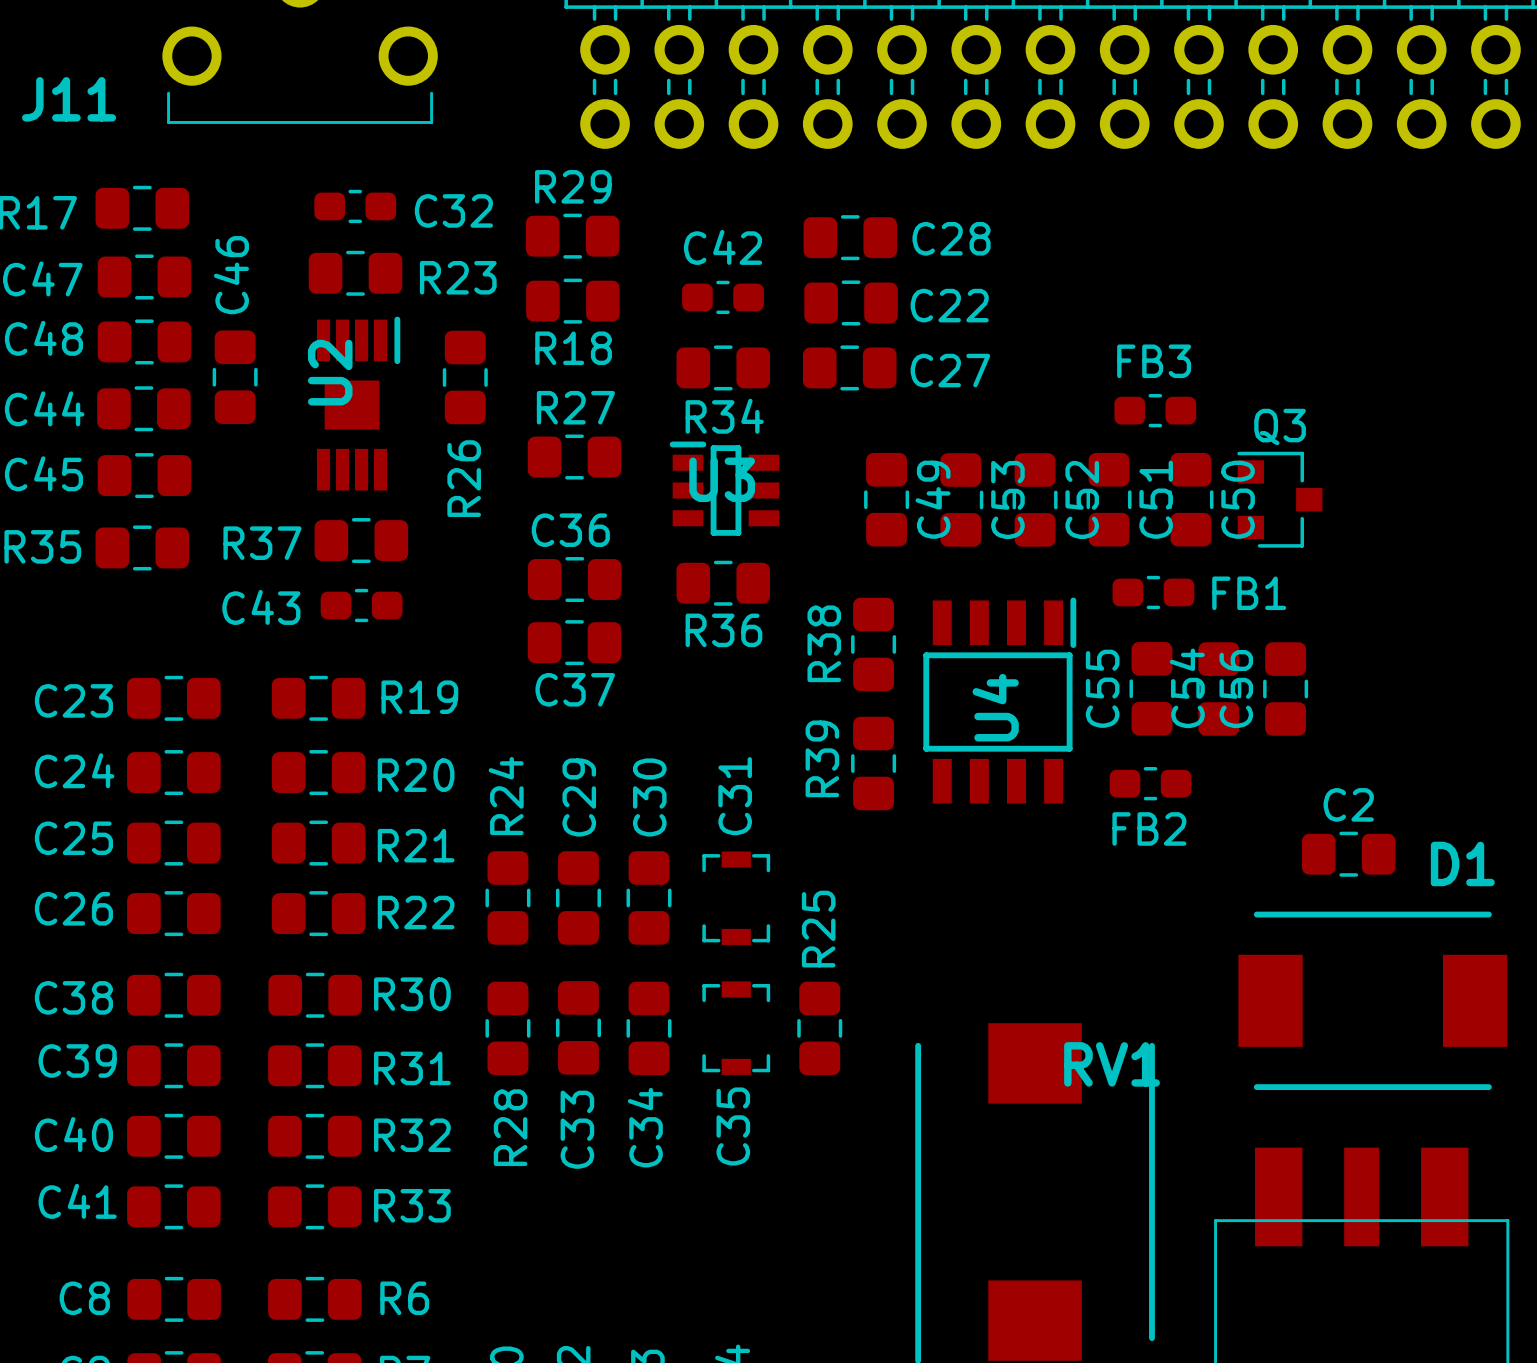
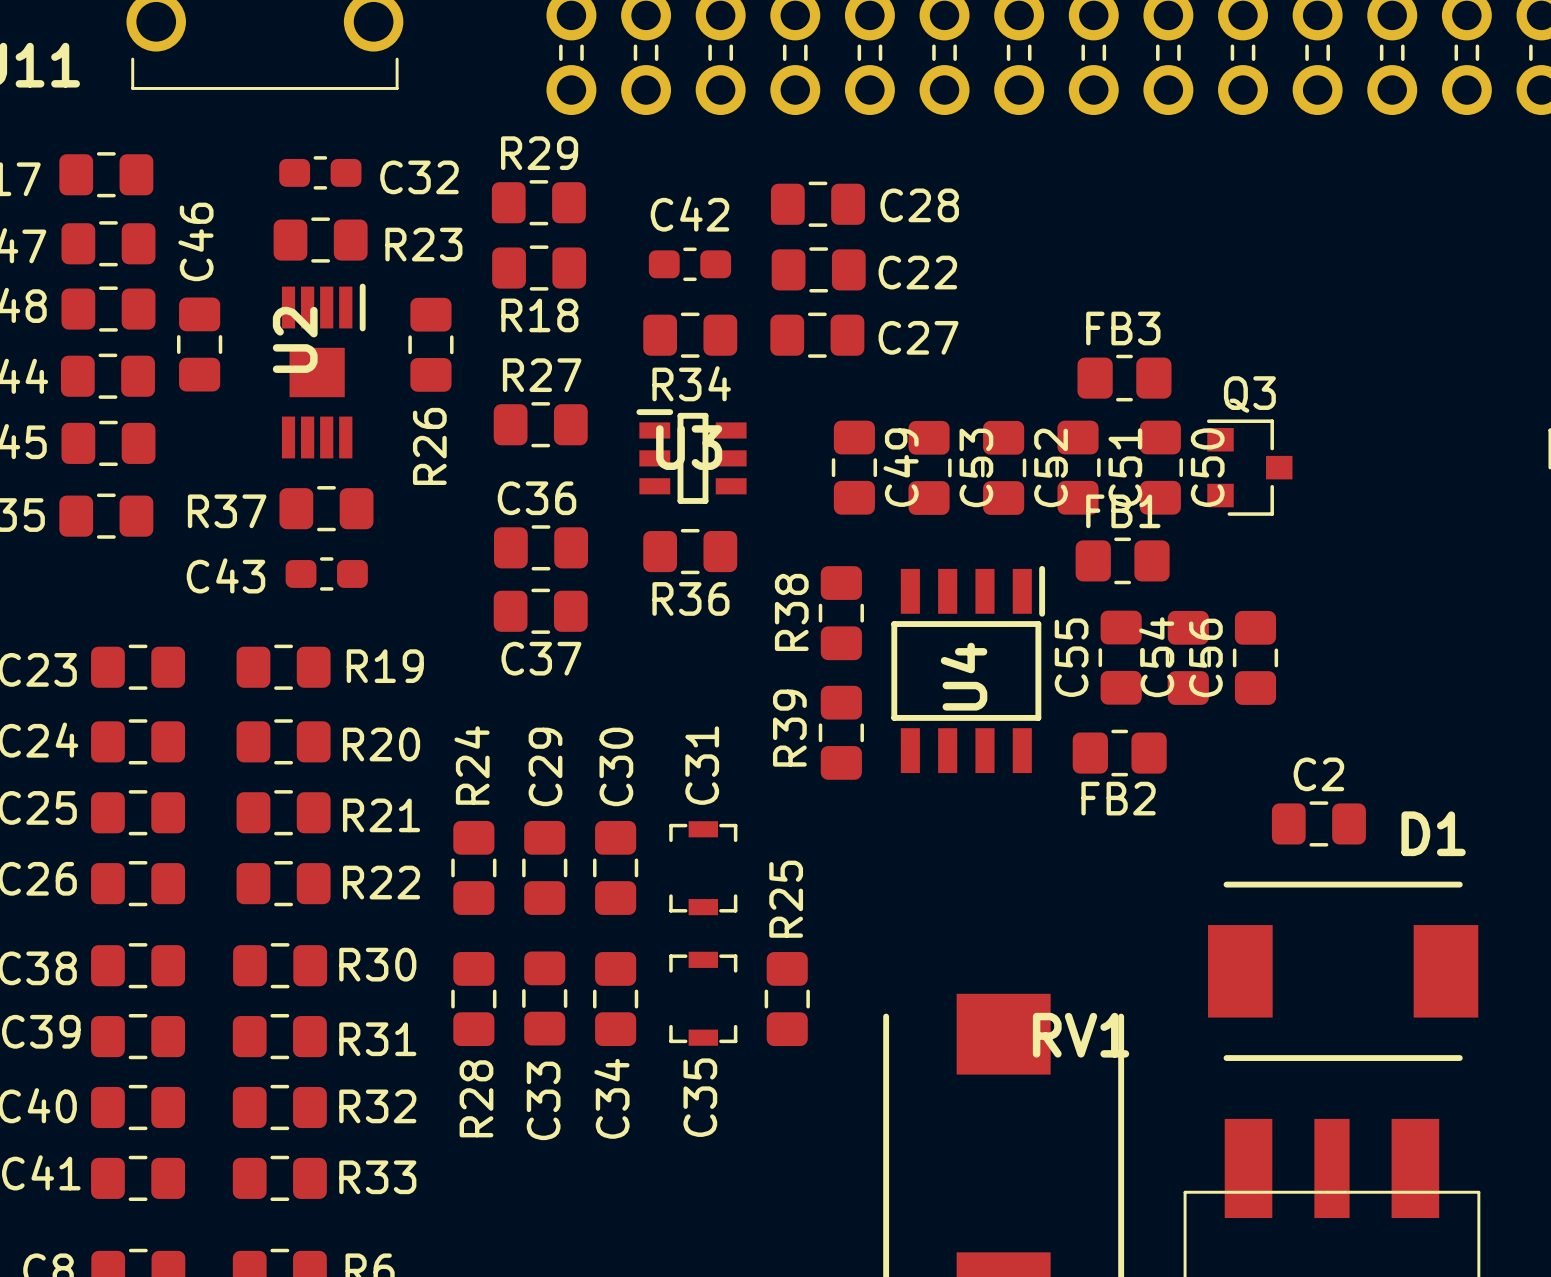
FB3 footprint: [1114, 393, 1197, 428] -> [1077, 354, 1172, 402]
FB1 footprint: [1112, 575, 1195, 610] -> [1075, 537, 1170, 585]
FB1 name position: FB1 (1249, 593) -> FB1 (1123, 511)
FB2 footprint: [1109, 767, 1192, 801] -> [1072, 729, 1167, 777]

